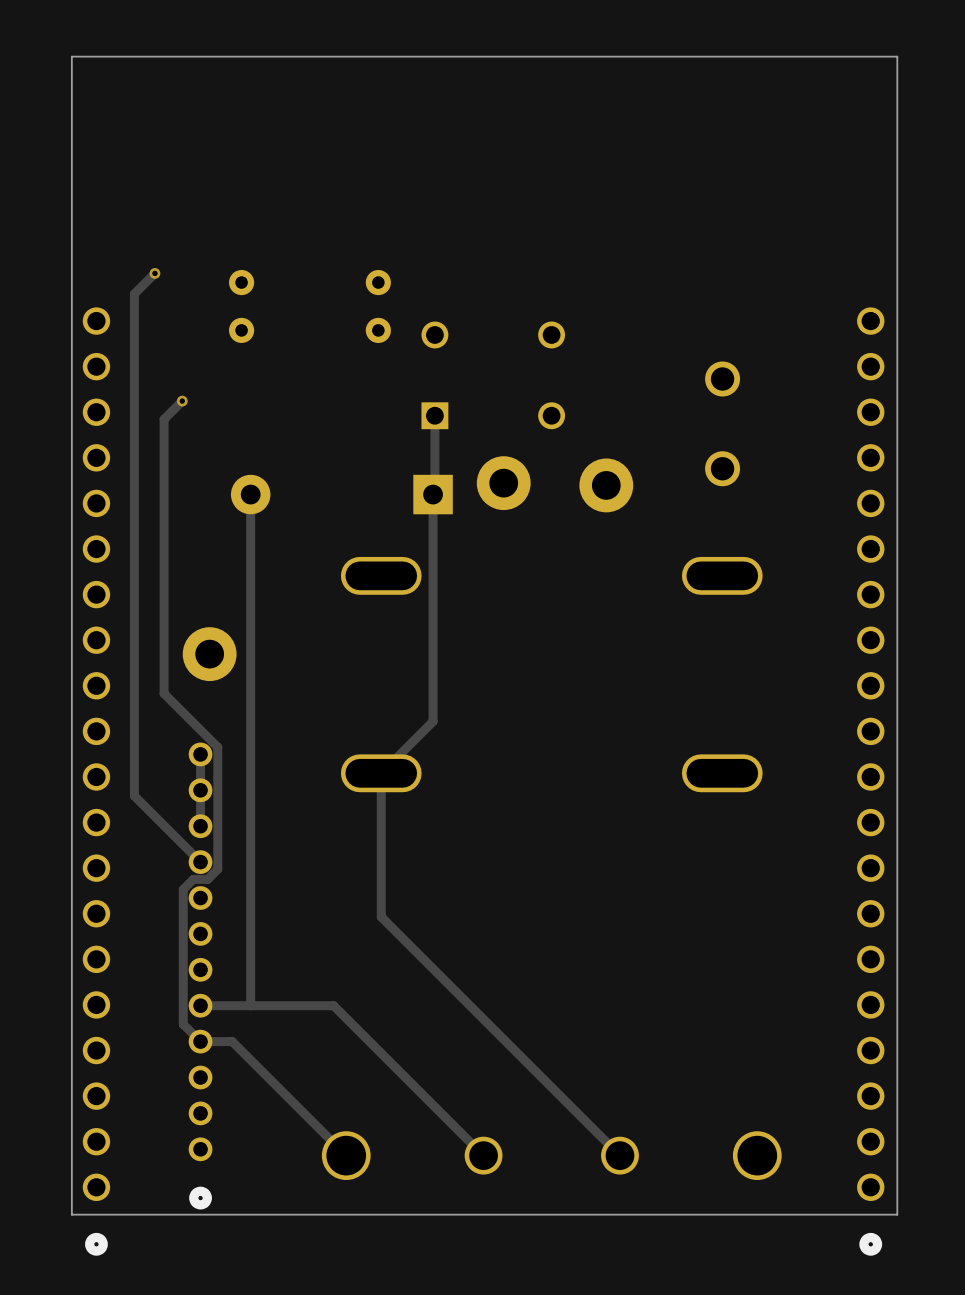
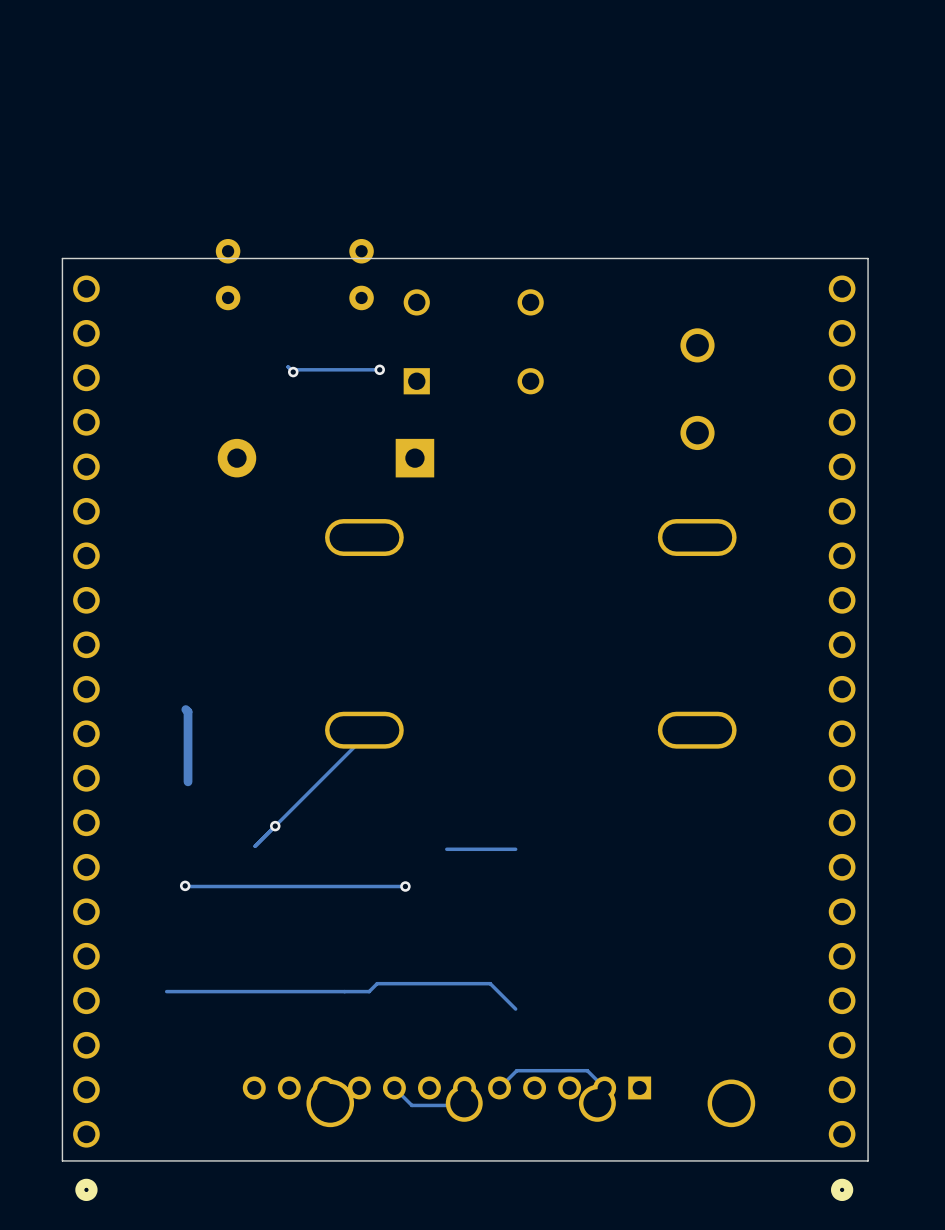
track: (154, 273) (134, 293) (134, 796) (200, 862) -> none
via: (154, 273) -> none
board edge: (897, 289) (897, 56) (71, 56) (71, 289) -> (868, 258) (62, 258)
track: (182, 401) (164, 419) (164, 693) (217, 747) (217, 869) (207, 879) (193, 879) (183, 889) (183, 1024) (200, 1041) (232, 1041) (346, 1155) -> none
via: (182, 401) -> none
track: none -> (288, 366) (293, 372) (295, 369) (379, 369)
via: none -> (379, 369)
via: none -> (293, 372)
track: (434, 415) (433, 721) (381, 773) (381, 916) (619, 1155) -> none
part: (503, 483) -> none
part: (606, 485) -> none
track: (250, 494) (250, 1005) -> none
part: (209, 654) -> none
track: none -> (385, 717) (368, 717) (368, 733) (255, 846)
via: none -> (275, 826)
track: none -> (515, 849) (446, 849)
track: none -> (185, 885) (405, 886)
via: none -> (185, 885)
via: none -> (405, 886)
part: (200, 976) -> none
track: (200, 1005) (333, 1005) (483, 1155) -> none
track: none -> (166, 991) (369, 991) (377, 983) (490, 983) (515, 1009)
part: none -> (446, 1087)
track: none -> (464, 1087) (447, 1105) (411, 1105) (394, 1087)
track: none -> (604, 1087) (587, 1070) (516, 1070) (499, 1087)

